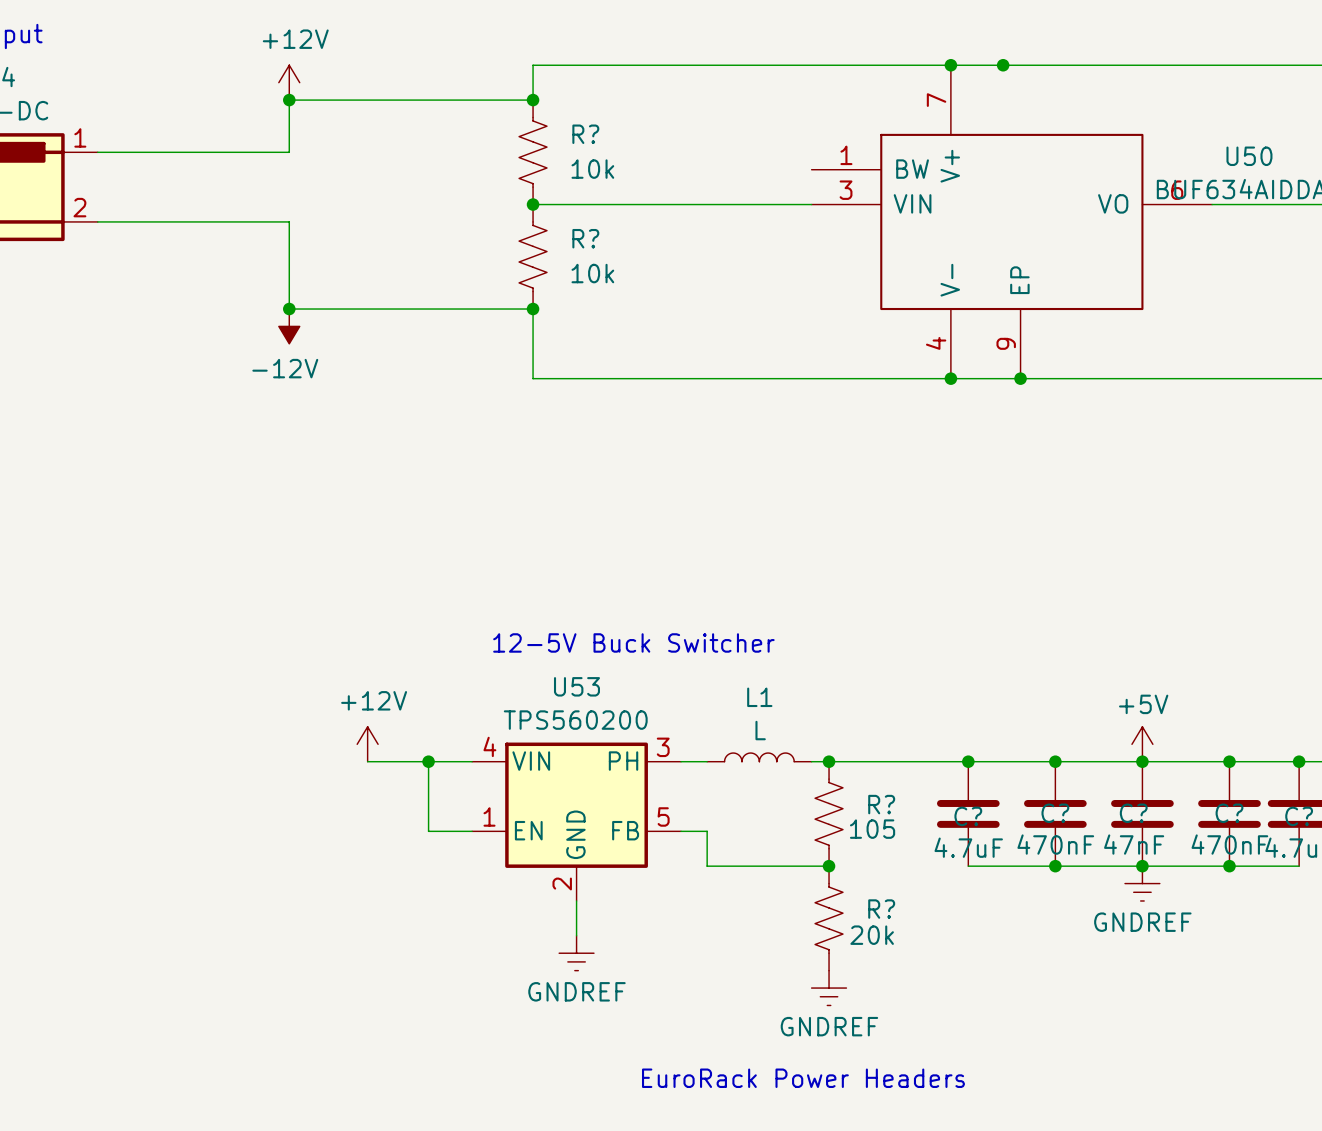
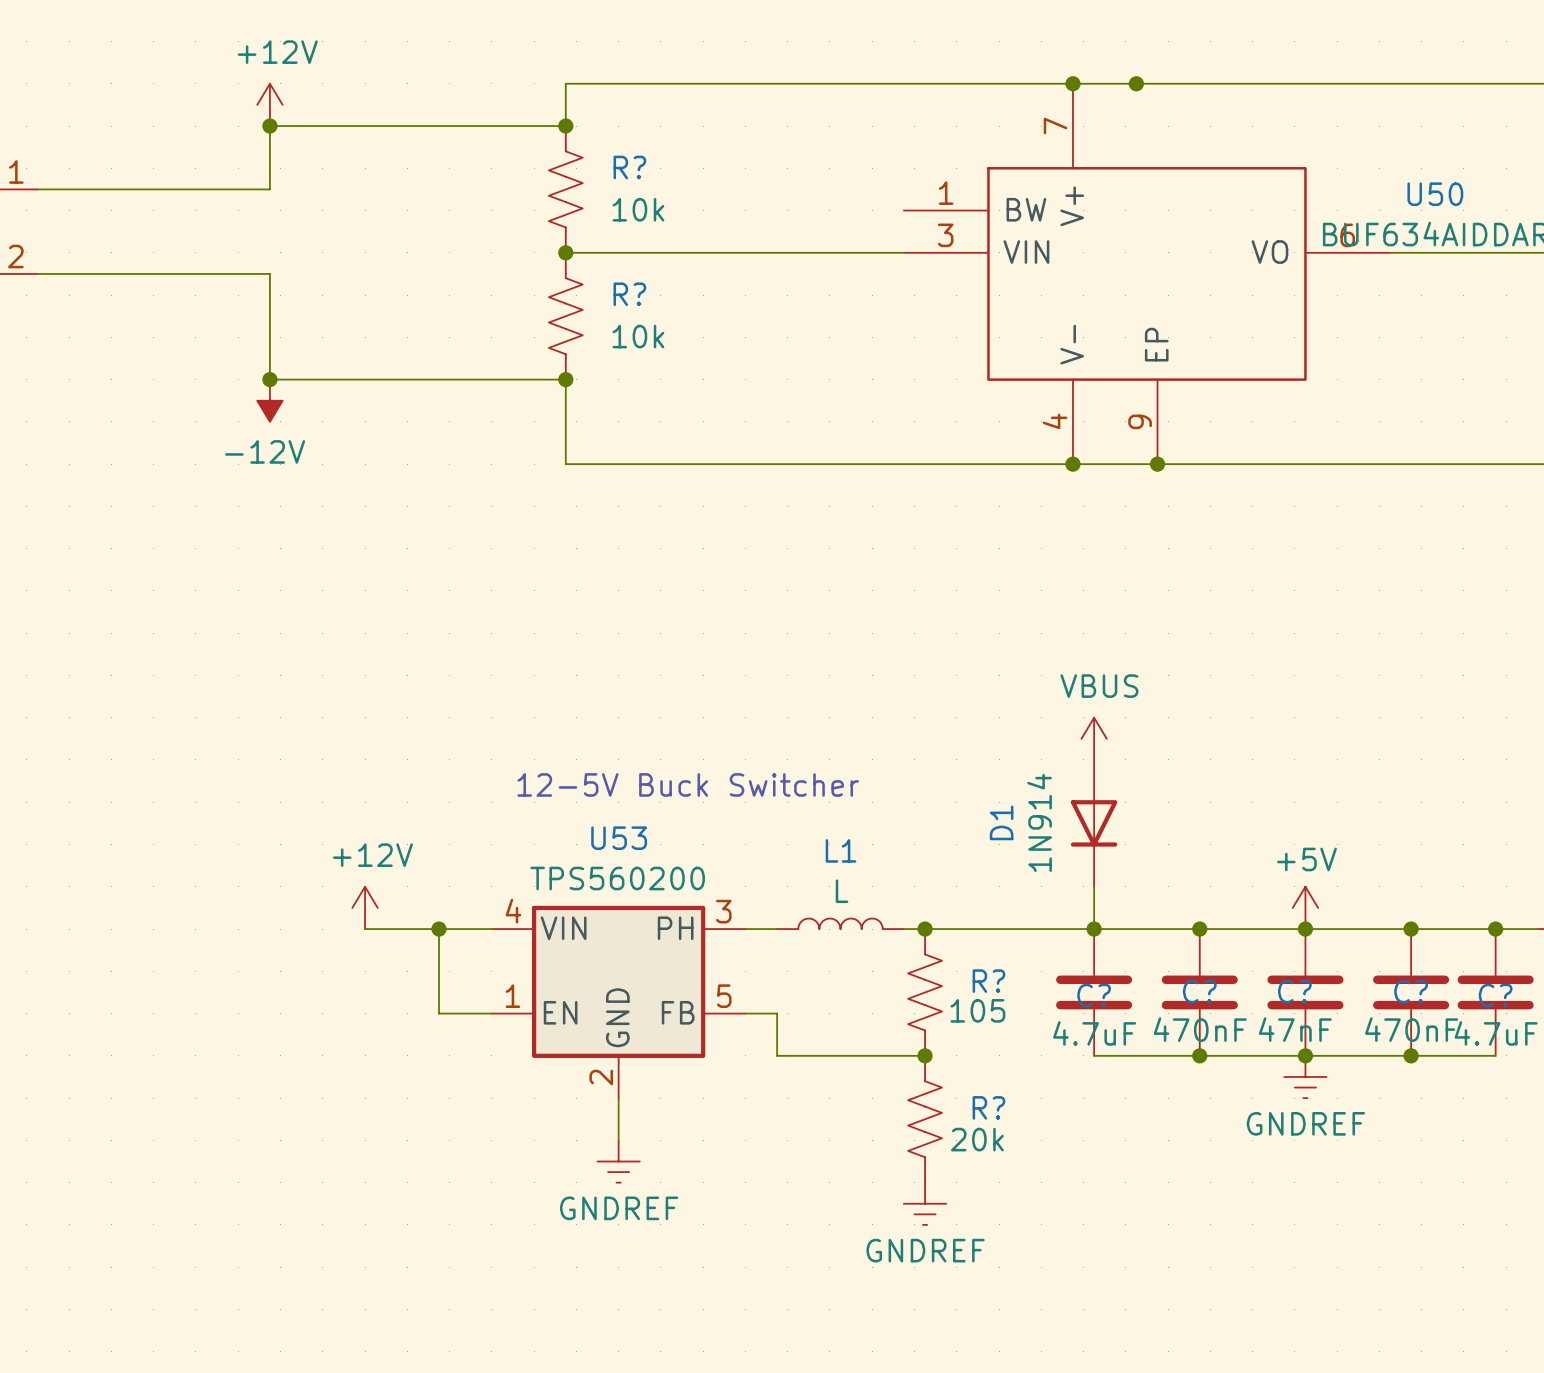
power symbol: none -> VBUS (1094, 738)
D1: none -> 1N914 (1094, 823)
wire: none -> (1094, 886) (1094, 929)
text: EuroRack Power Headers (803, 1078) -> none

